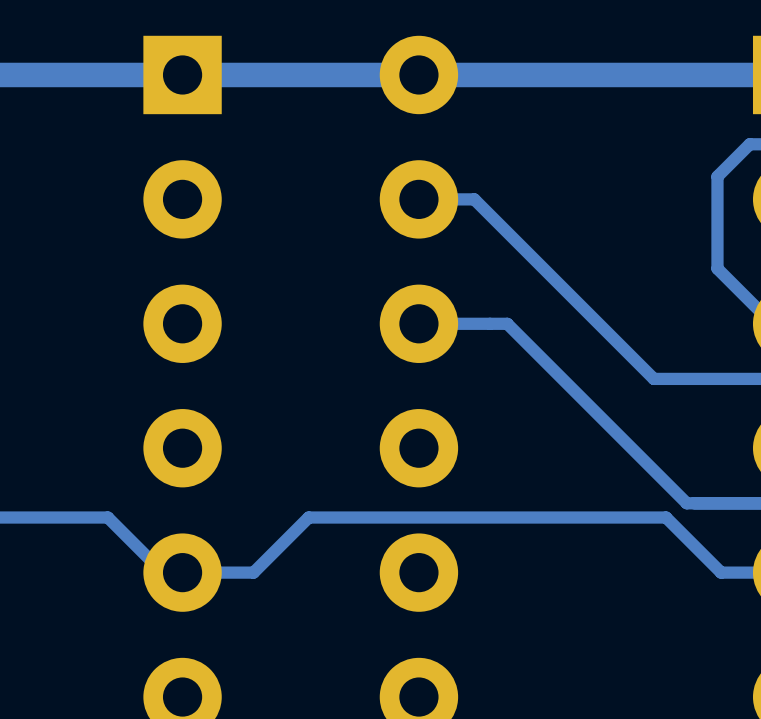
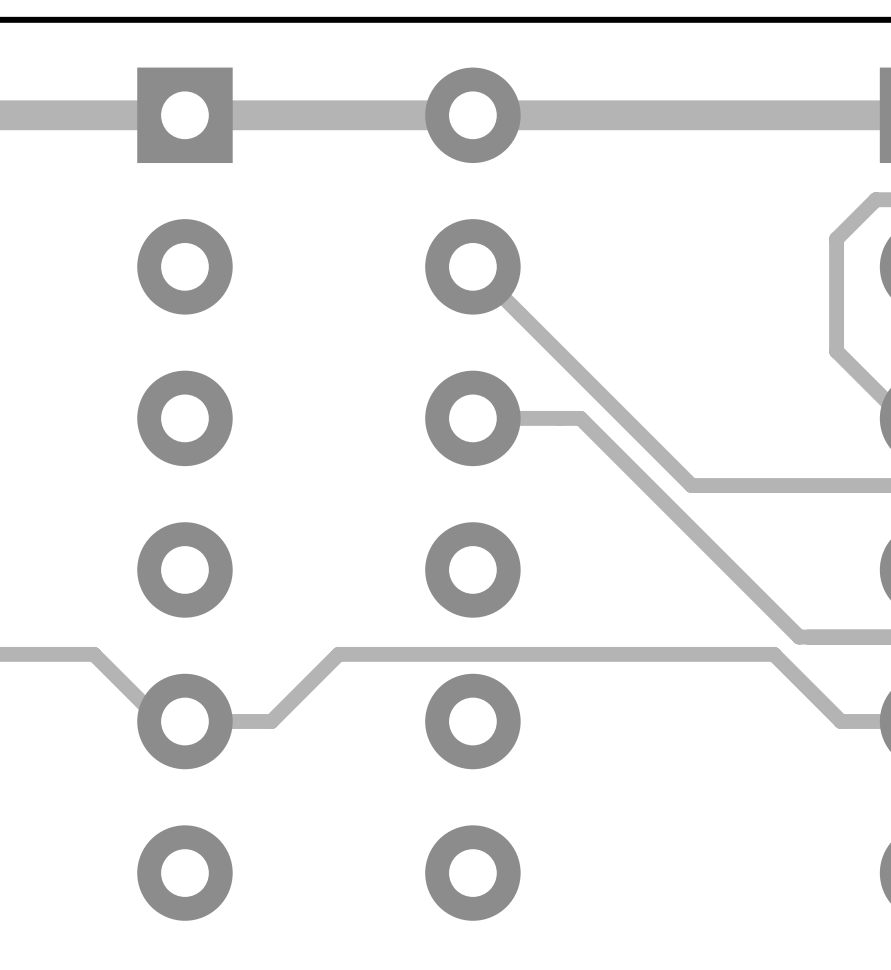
track: (418, 199) (474, 199) (653, 378) -> (472, 266) (691, 485) (759, 485)

